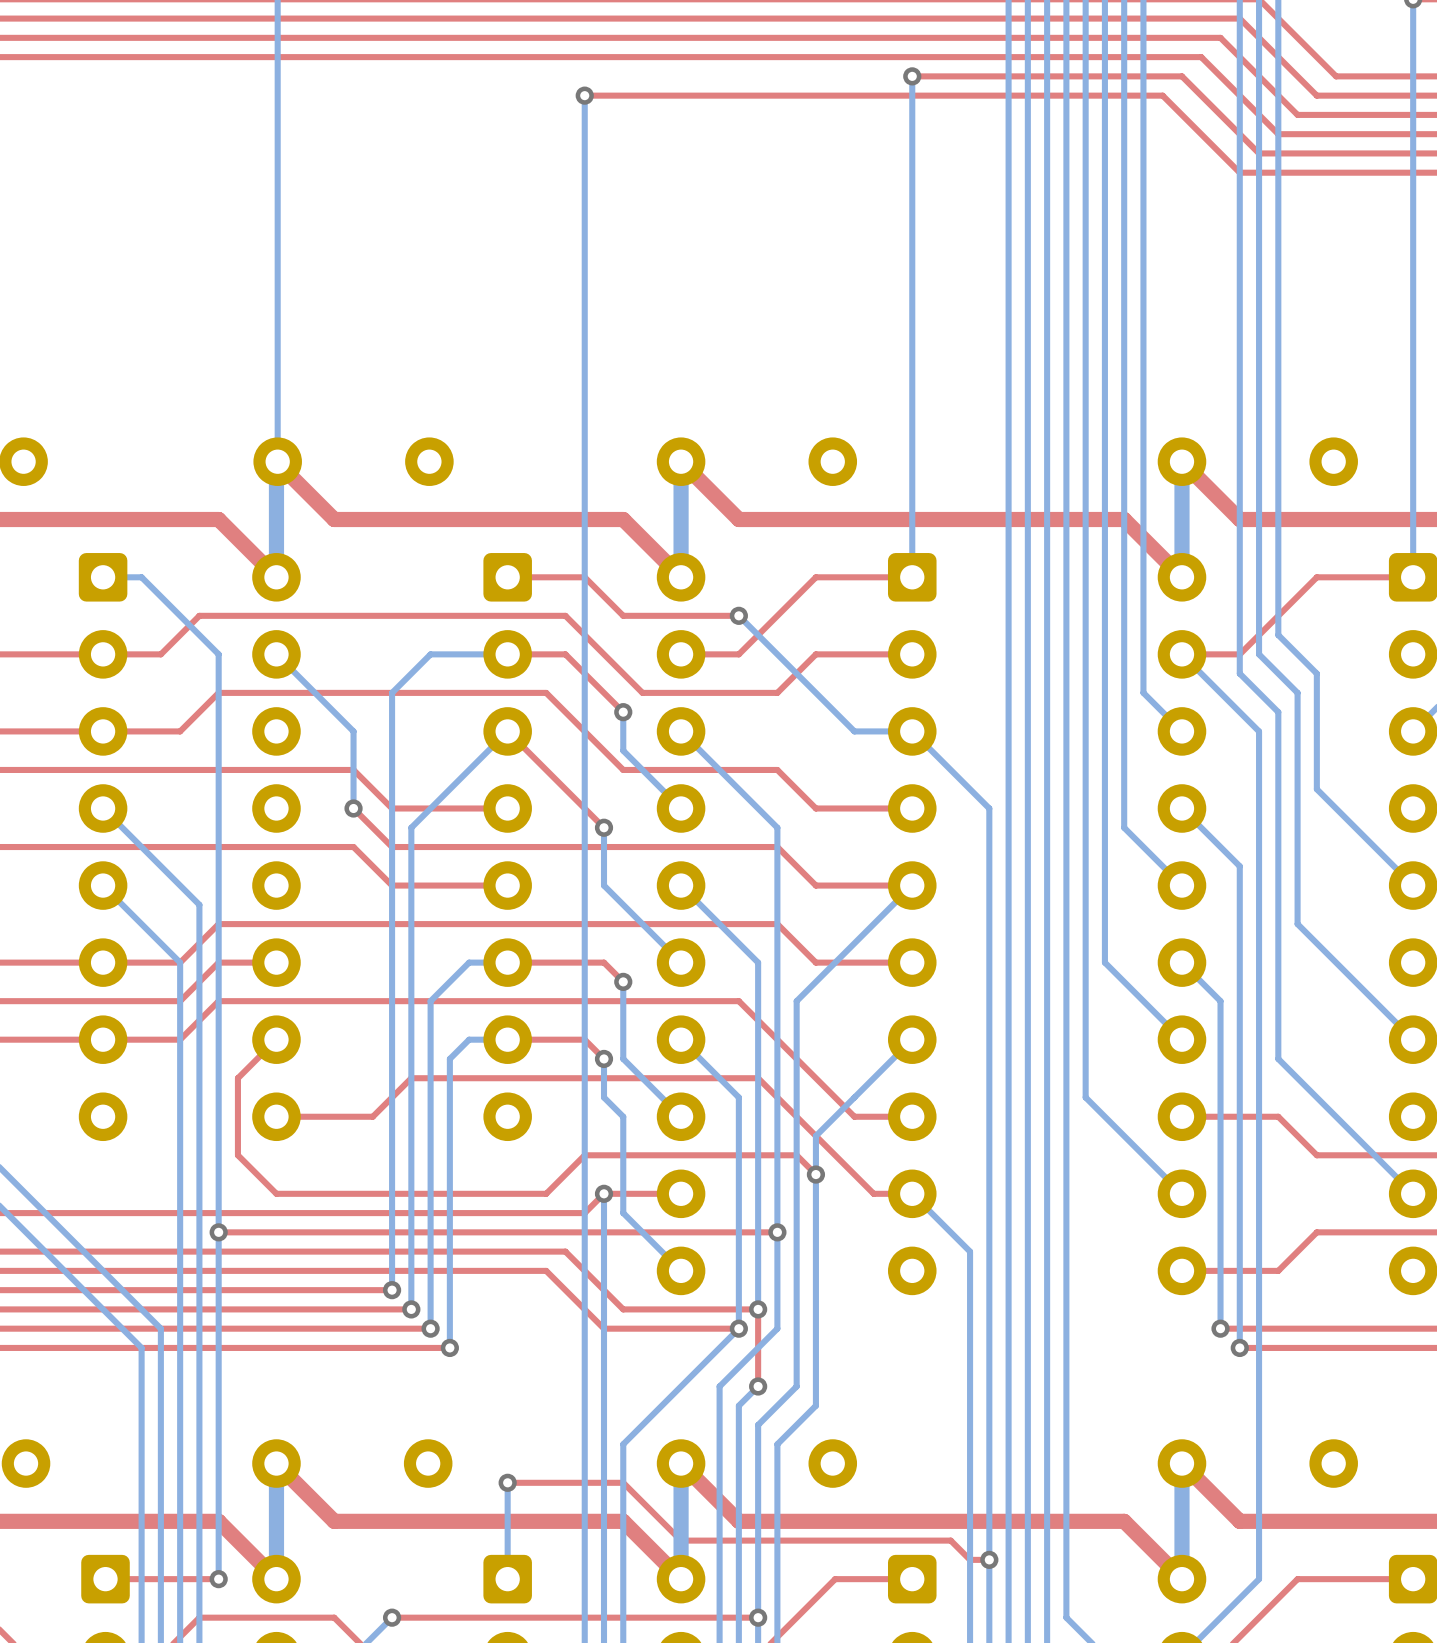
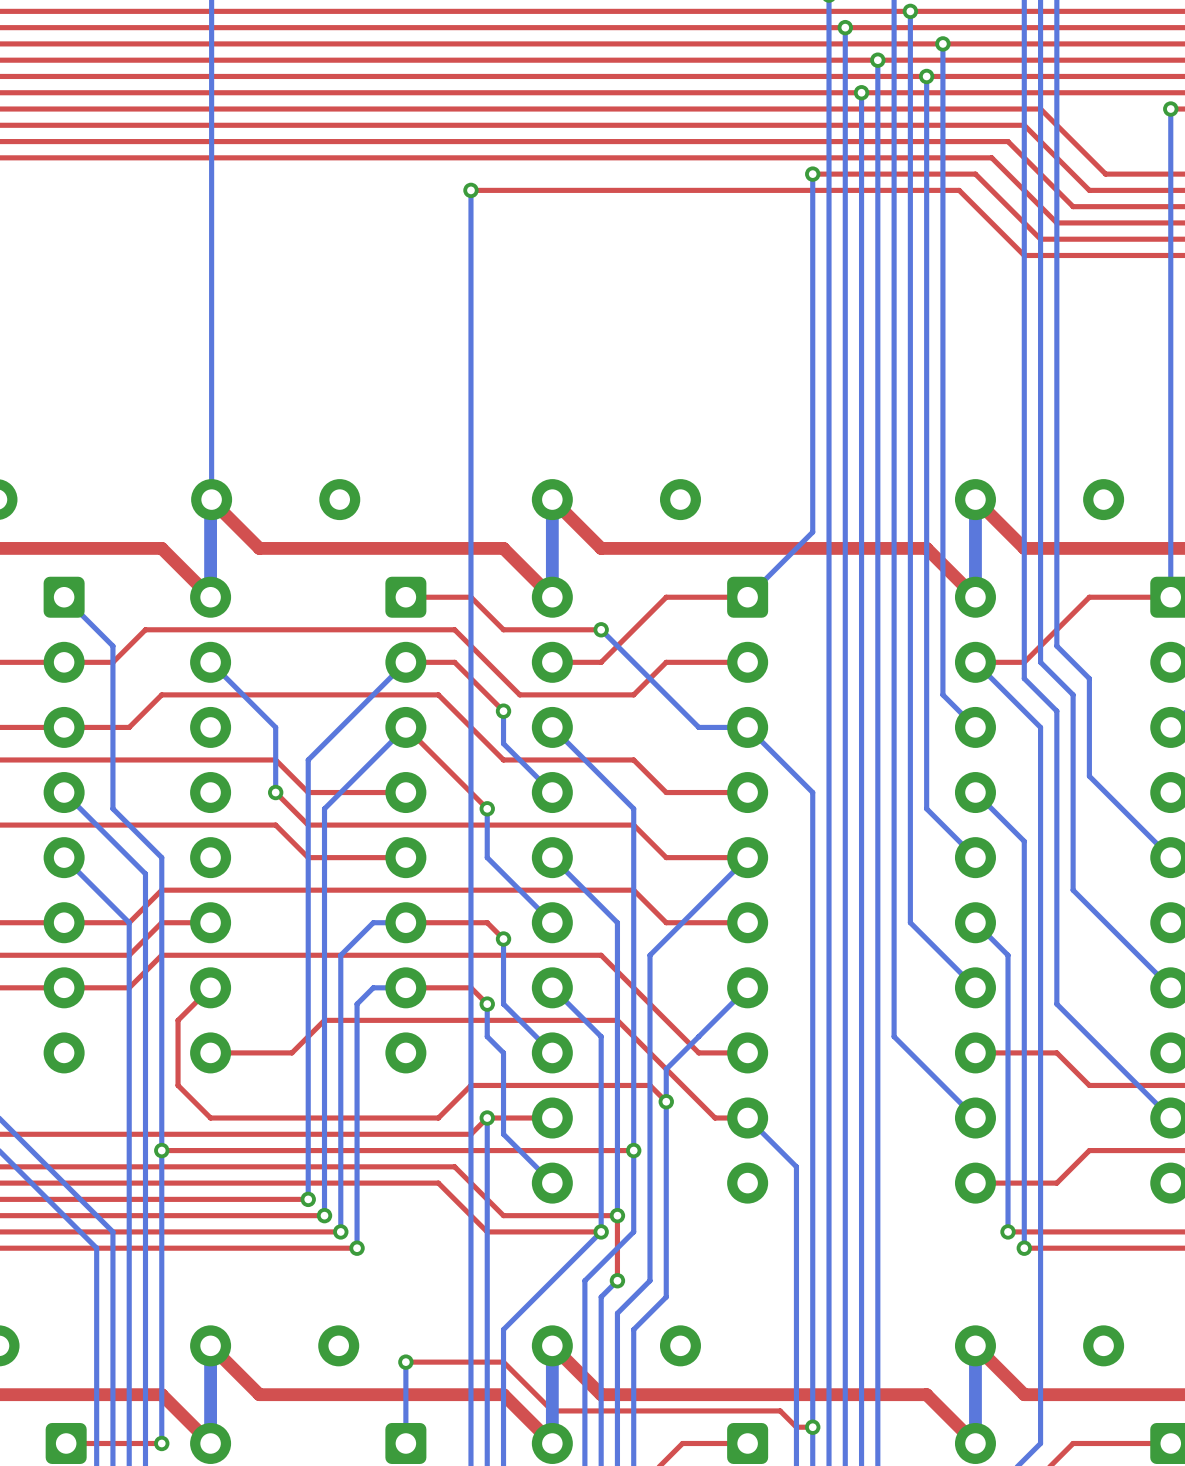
bottom track: (912, 76) (912, 577) -> (812, 174) (812, 532) (747, 597)
via position: (912, 76) -> (812, 174)
top track: (989, 76) (912, 76) -> none
bottom track: (103, 577) (141, 577) (218, 654) (218, 885) -> (64, 597) (112, 646) (112, 808) (161, 857)
bottom track: (507, 654) (430, 654) (392, 692) (392, 769) -> (405, 662) (308, 759)

